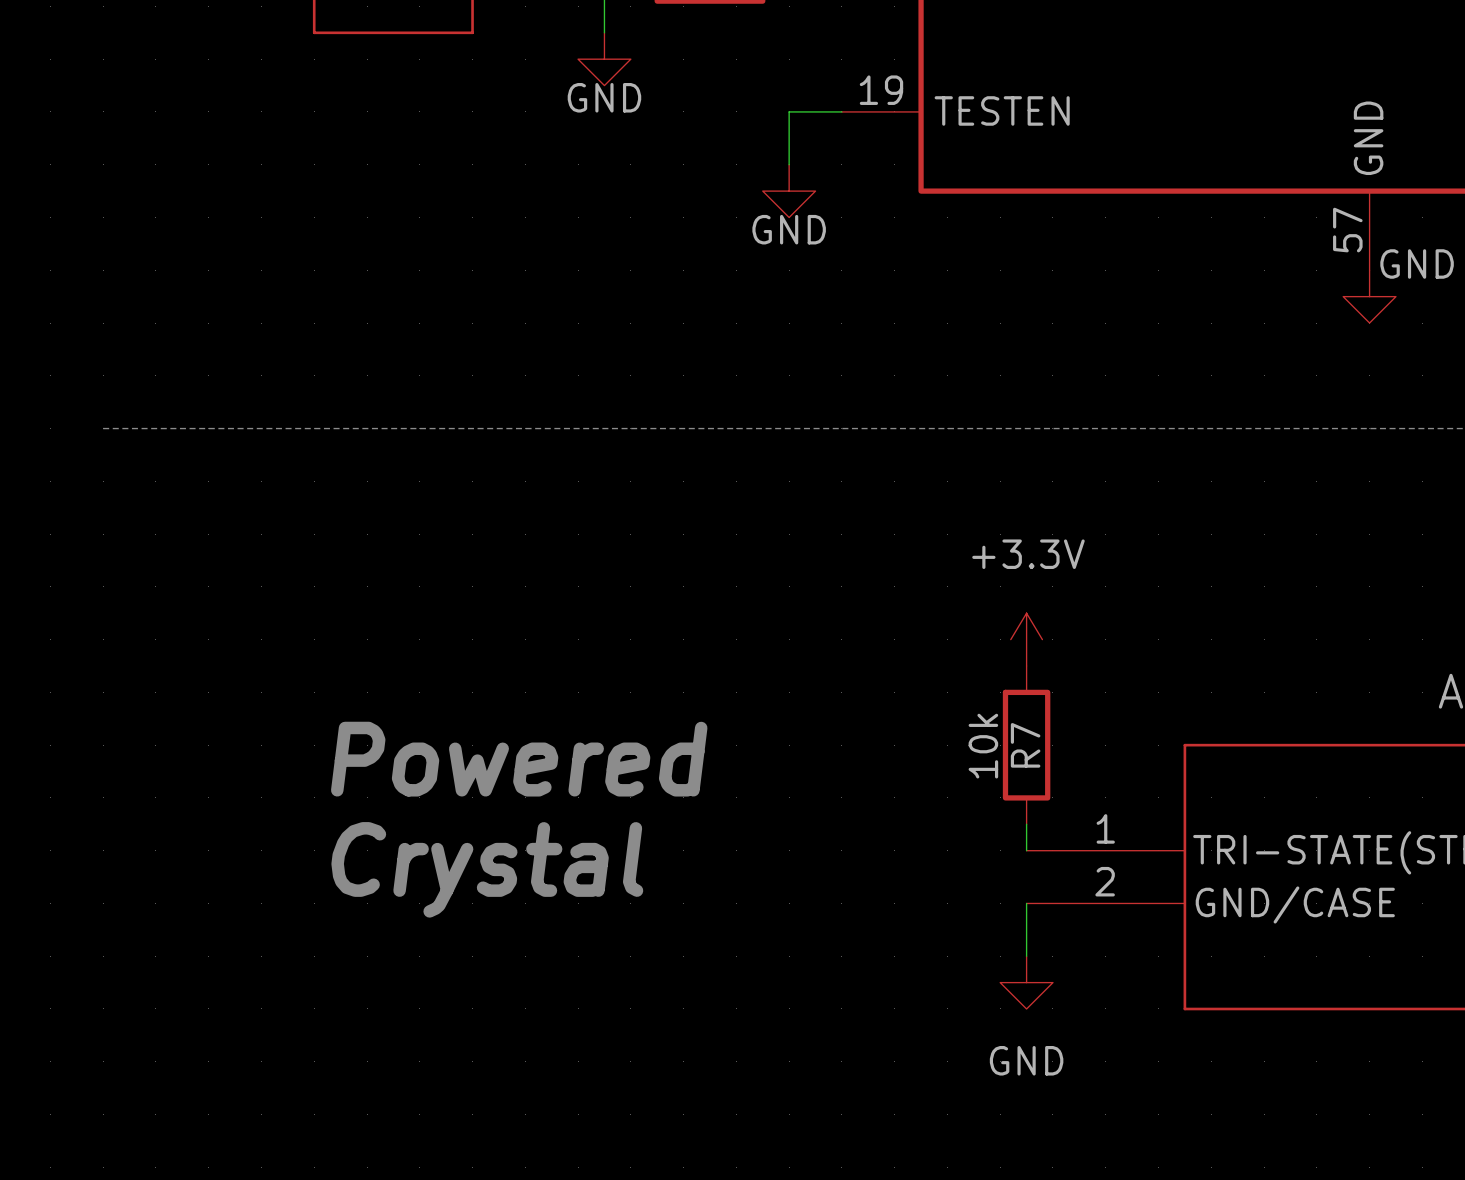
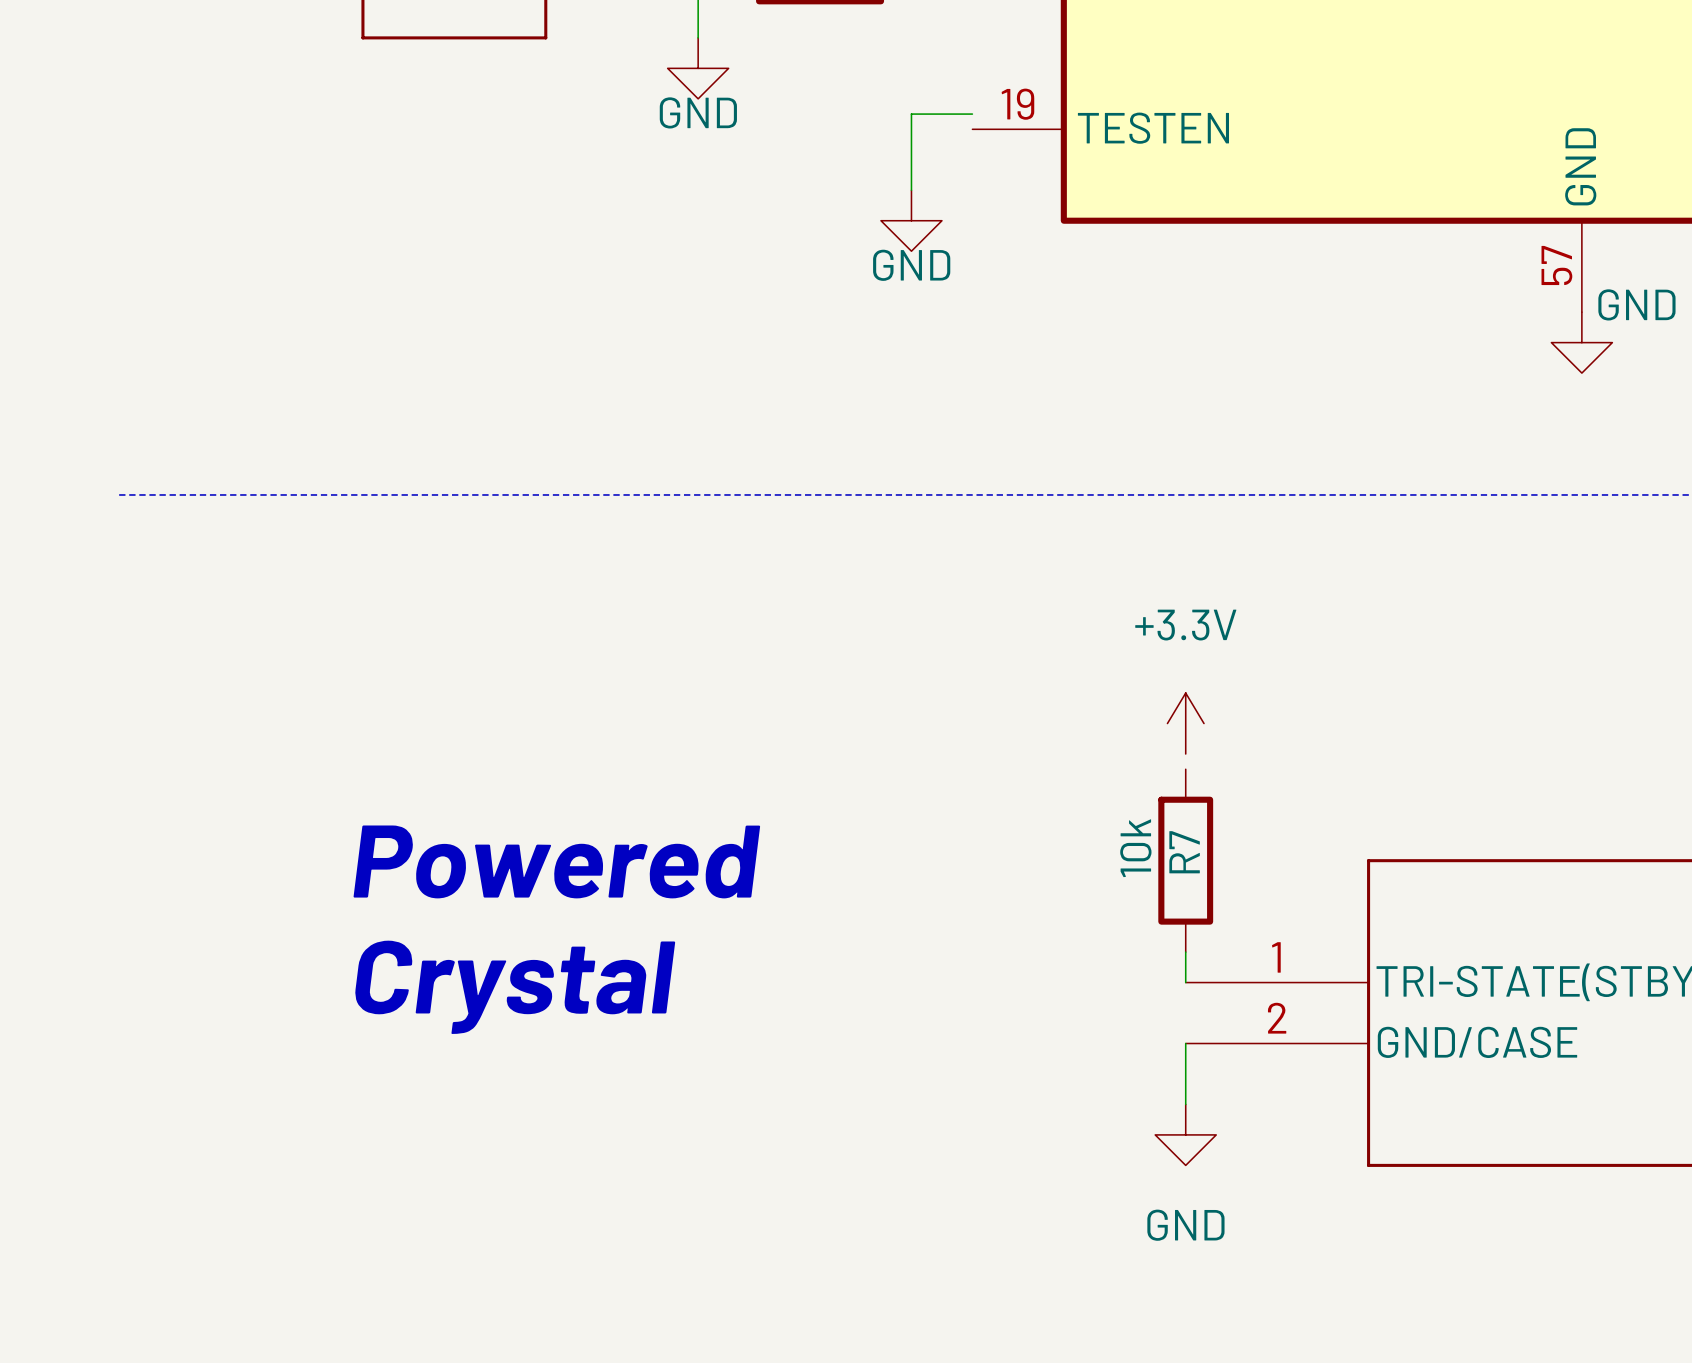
wire: (789, 111) (841, 111) -> (911, 129) (911, 114) (972, 114)
power symbol position: +3.3V (1026, 639) -> +3.3V (1185, 723)
text position: Powered (519, 759) -> Powered (556, 861)
text position: Crystal (487, 869) -> Crystal (514, 987)

